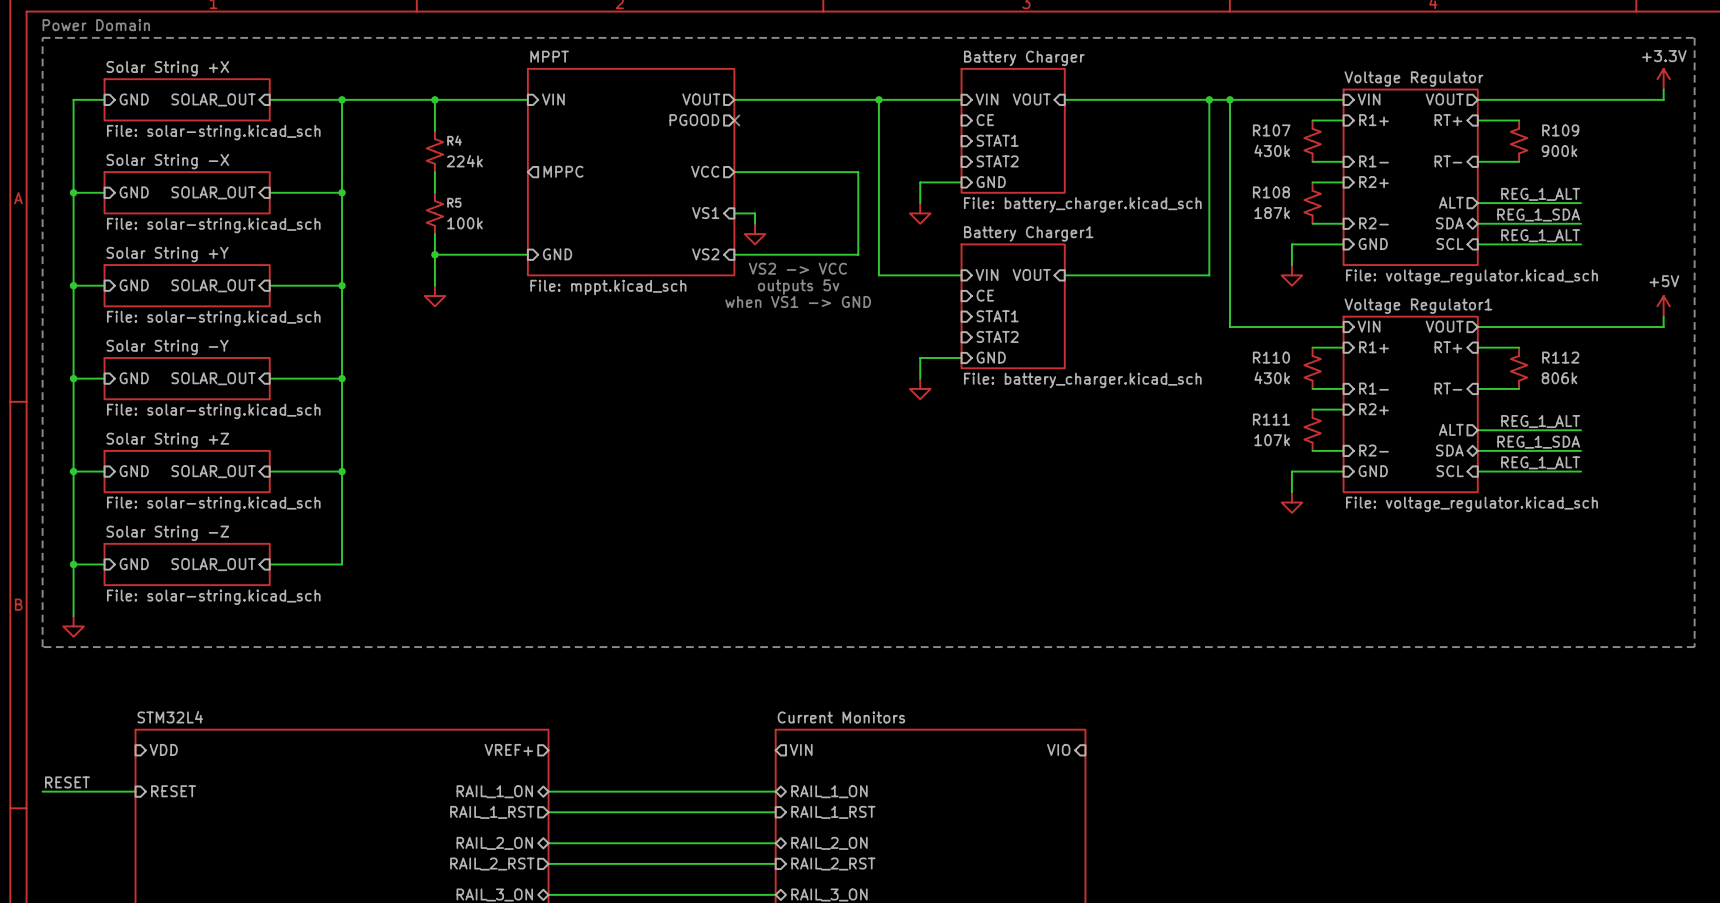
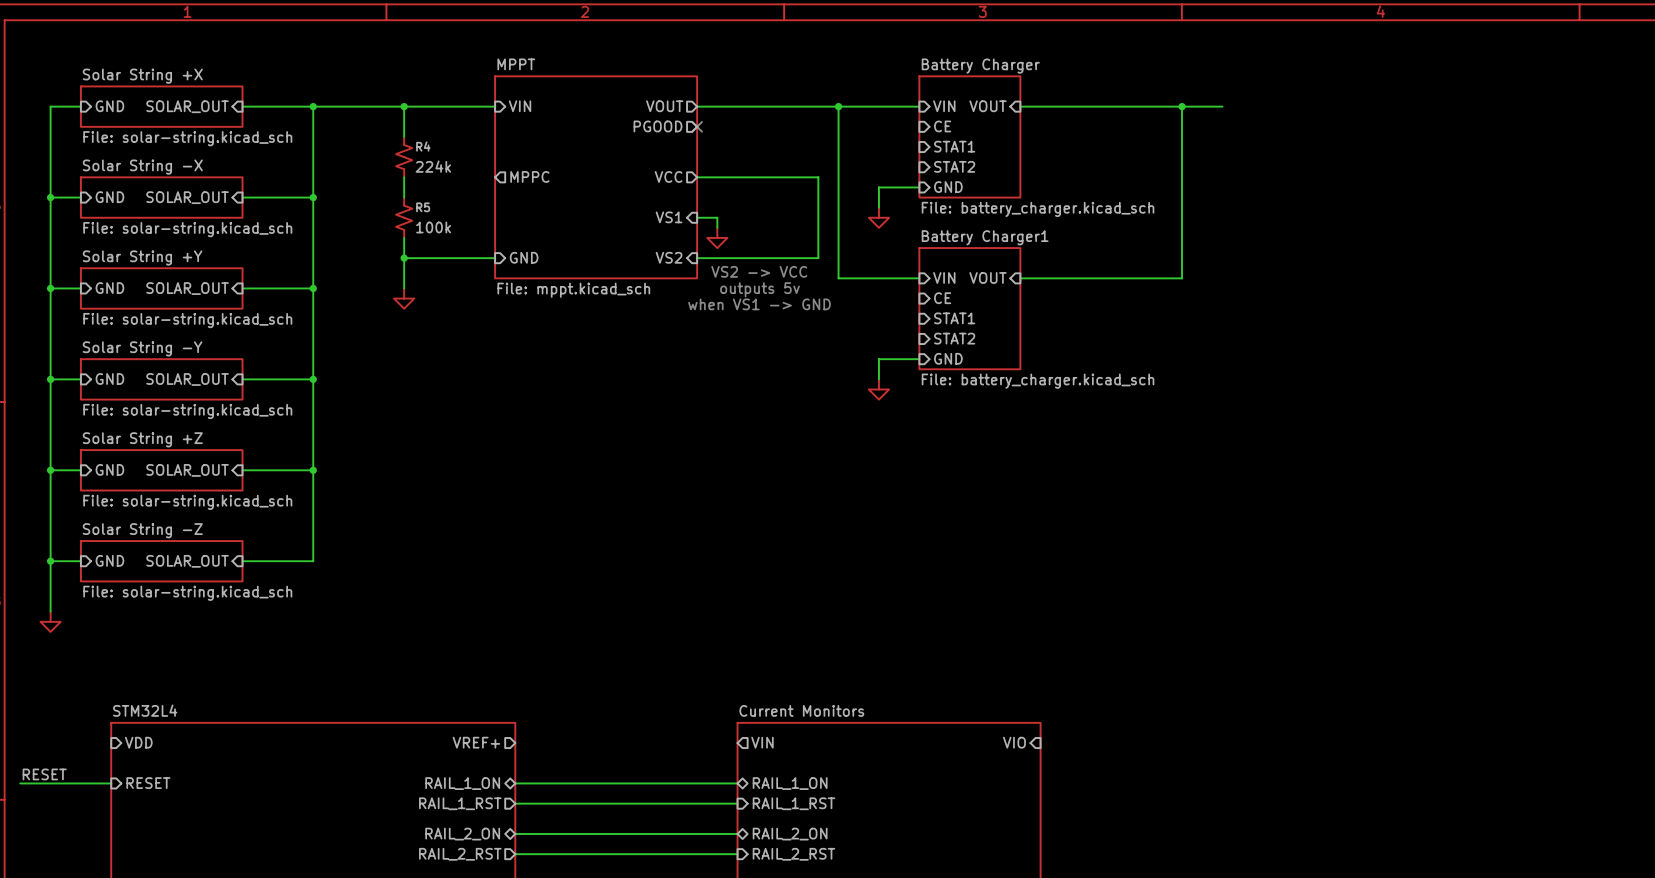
text: Power Domain (96, 25) -> none
line: (42, 37) (1694, 37) (1694, 647) (42, 647) (42, 37) -> none
power symbol: +3.3V (1663, 79) -> none
wire: (1663, 89) (1663, 99) (1477, 99) -> none
wire: (1209, 99) (1209, 275) -> none
junction: (1209, 99) -> none
wire: (1271, 99) (1343, 99) -> none
sheet pin: VIN (1369, 99) -> none
sheet pin: VOUT (1444, 99) -> none
wire: (1312, 120) (1343, 120) -> none
sheet pin: R1+ (1373, 120) -> none
sheet pin: RT+ (1448, 120) -> none
wire: (1477, 120) (1519, 120) -> none
R107: 430k (1312, 141) -> none
R109: 900k (1519, 141) -> none
wire: (1312, 161) (1343, 161) -> none
sheet pin: R1- (1373, 161) -> none
sheet pin: RT- (1448, 161) -> none
wire: (1477, 161) (1519, 161) -> none
sheet Voltage Regulator: File: voltage_regulator.kicad_sch (1410, 177) -> none
wire: (1312, 182) (1343, 182) -> none
sheet pin: R2+ (1373, 182) -> none
label: REG_1_ALT (1540, 194) -> none
sheet pin: ALT (1451, 202) -> none
R108: 187k (1312, 203) -> none
wire: (1477, 203) (1581, 203) -> none
label: REG_1_SDA (1538, 215) -> none
wire: (1312, 223) (1343, 223) -> none
sheet pin: R2- (1373, 223) -> none
sheet pin: SDA (1449, 223) -> none
wire: (1477, 223) (1581, 223) -> none
label: REG_1_ALT (1540, 235) -> none
wire: (1343, 244) (1291, 244) (1291, 265) -> none
sheet pin: GND (1373, 244) -> none
sheet pin: SCL (1450, 244) -> none
wire: (1477, 244) (1581, 244) -> none
wire: (1229, 275) (1229, 327) (1343, 327) -> (1182, 278) (1161, 278)
power symbol: (1291, 275) -> none
power symbol: +5V (1663, 306) -> none
wire: (1663, 316) (1663, 327) (1477, 327) -> none
sheet pin: VIN (1369, 326) -> none
sheet pin: VOUT (1444, 326) -> none
wire: (1312, 347) (1343, 347) -> none
sheet pin: R1+ (1373, 347) -> none
sheet pin: RT+ (1448, 347) -> none
wire: (1477, 347) (1519, 347) -> none
R110: 430k (1312, 368) -> none
R112: 806k (1519, 368) -> none
wire: (1312, 388) (1343, 388) -> none
sheet pin: R1- (1373, 388) -> none
sheet pin: RT- (1448, 388) -> none
wire: (1477, 388) (1519, 388) -> none
sheet Voltage Regulator1: File: voltage_regulator.kicad_sch (1410, 404) -> none
wire: (1312, 409) (1343, 409) -> none
sheet pin: R2+ (1373, 409) -> none
label: REG_1_ALT (1540, 421) -> none
sheet pin: ALT (1451, 429) -> none
R111: 107k (1312, 430) -> none
wire: (1477, 430) (1581, 430) -> none
label: REG_1_SDA (1538, 442) -> none
wire: (1312, 450) (1343, 450) -> none
sheet pin: R2- (1373, 450) -> none
sheet pin: SDA (1449, 450) -> none
wire: (1477, 450) (1581, 450) -> none
label: REG_1_ALT (1540, 462) -> none
wire: (1343, 471) (1291, 471) (1291, 492) -> none
sheet pin: GND (1373, 471) -> none
sheet pin: SCL (1450, 471) -> none
wire: (1477, 471) (1581, 471) -> none
power symbol: (1291, 502) -> none

